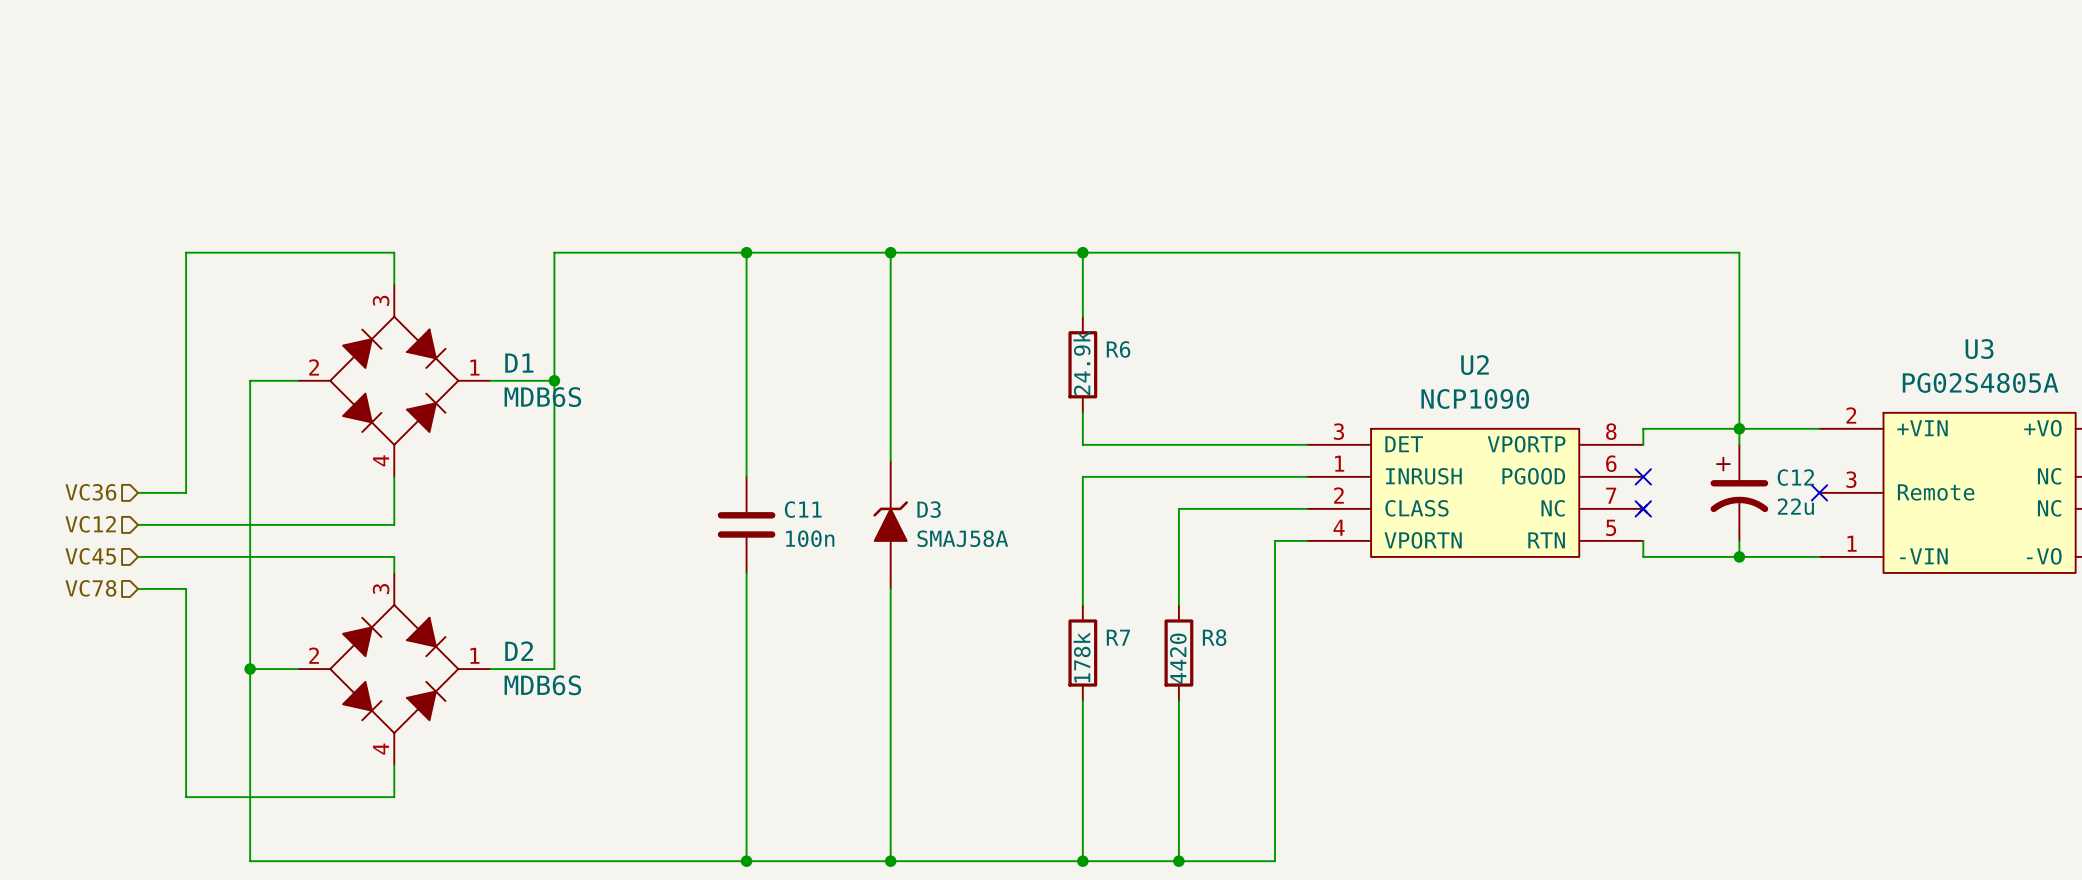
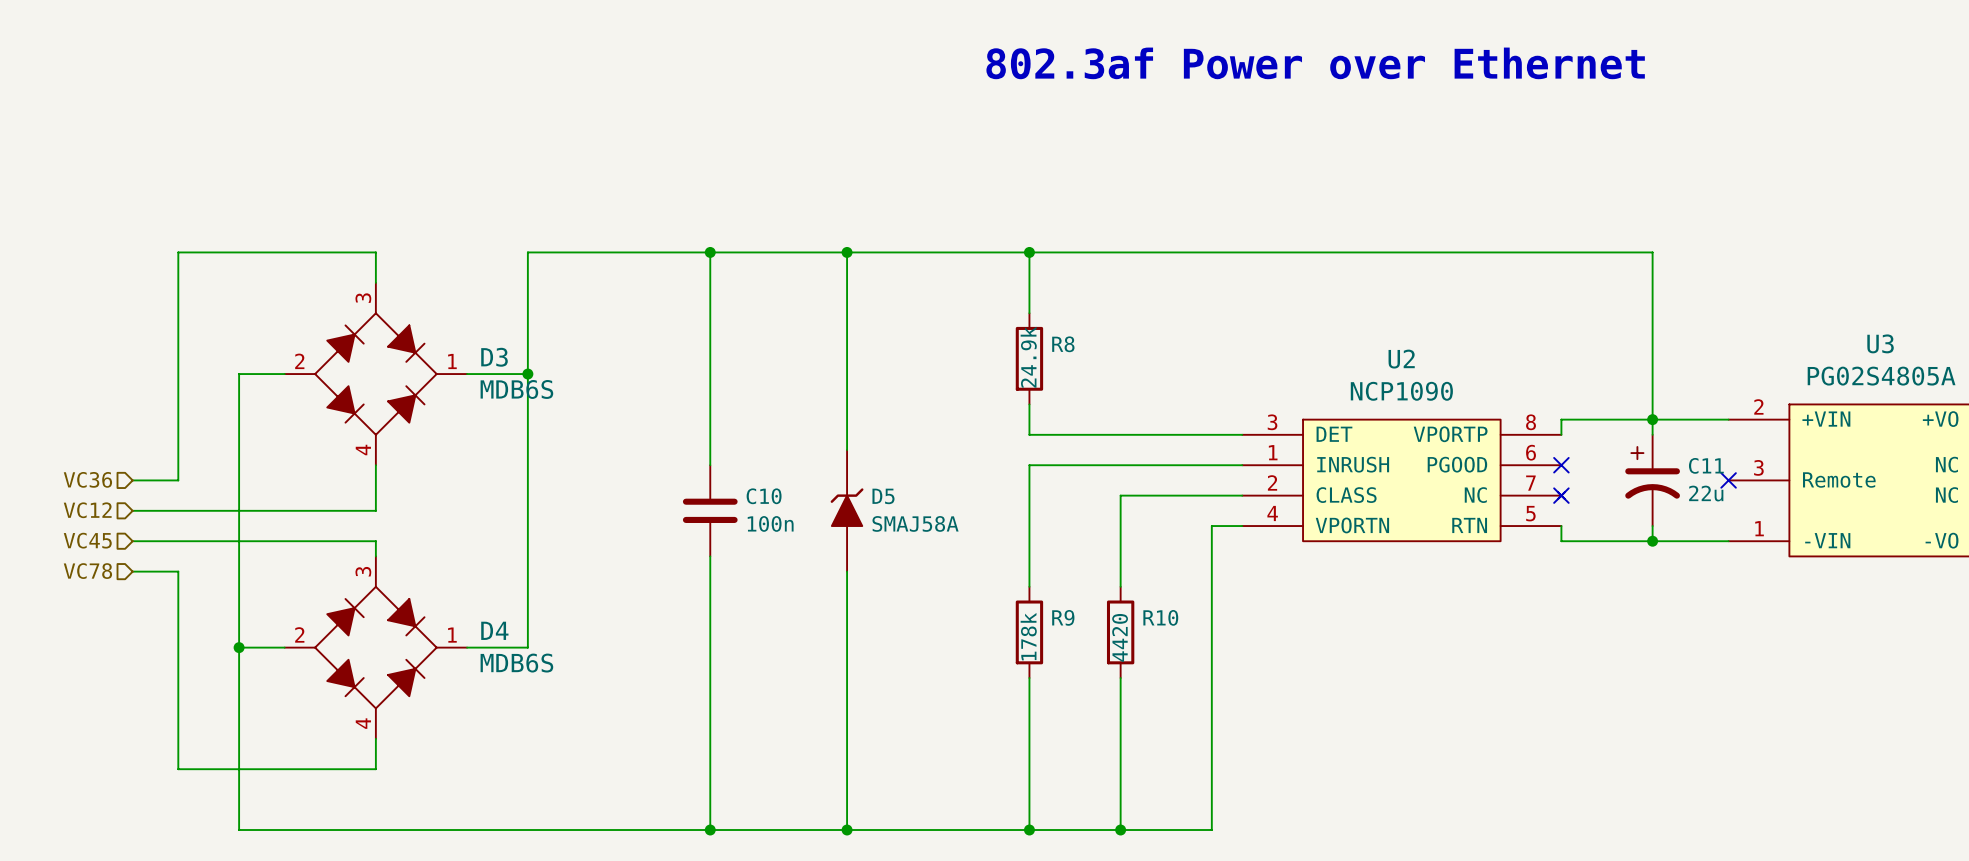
text: none -> 802.3af Power over Ethernet (1315, 63)
R6 name: R6 (1118, 349) -> R8 (1063, 344)
D1 name: D1 (519, 363) -> D3 (494, 357)
C12 name: C12 (1795, 477) -> C11 (1706, 465)
C11 name: C11 (803, 509) -> C10 (764, 496)
D3 name: D3 (929, 509) -> D5 (883, 496)
R7 name: R7 (1118, 637) -> R9 (1063, 617)
R8 name: R8 (1214, 637) -> R10 (1160, 617)
D2 name: D2 (519, 651) -> D4 (494, 630)

